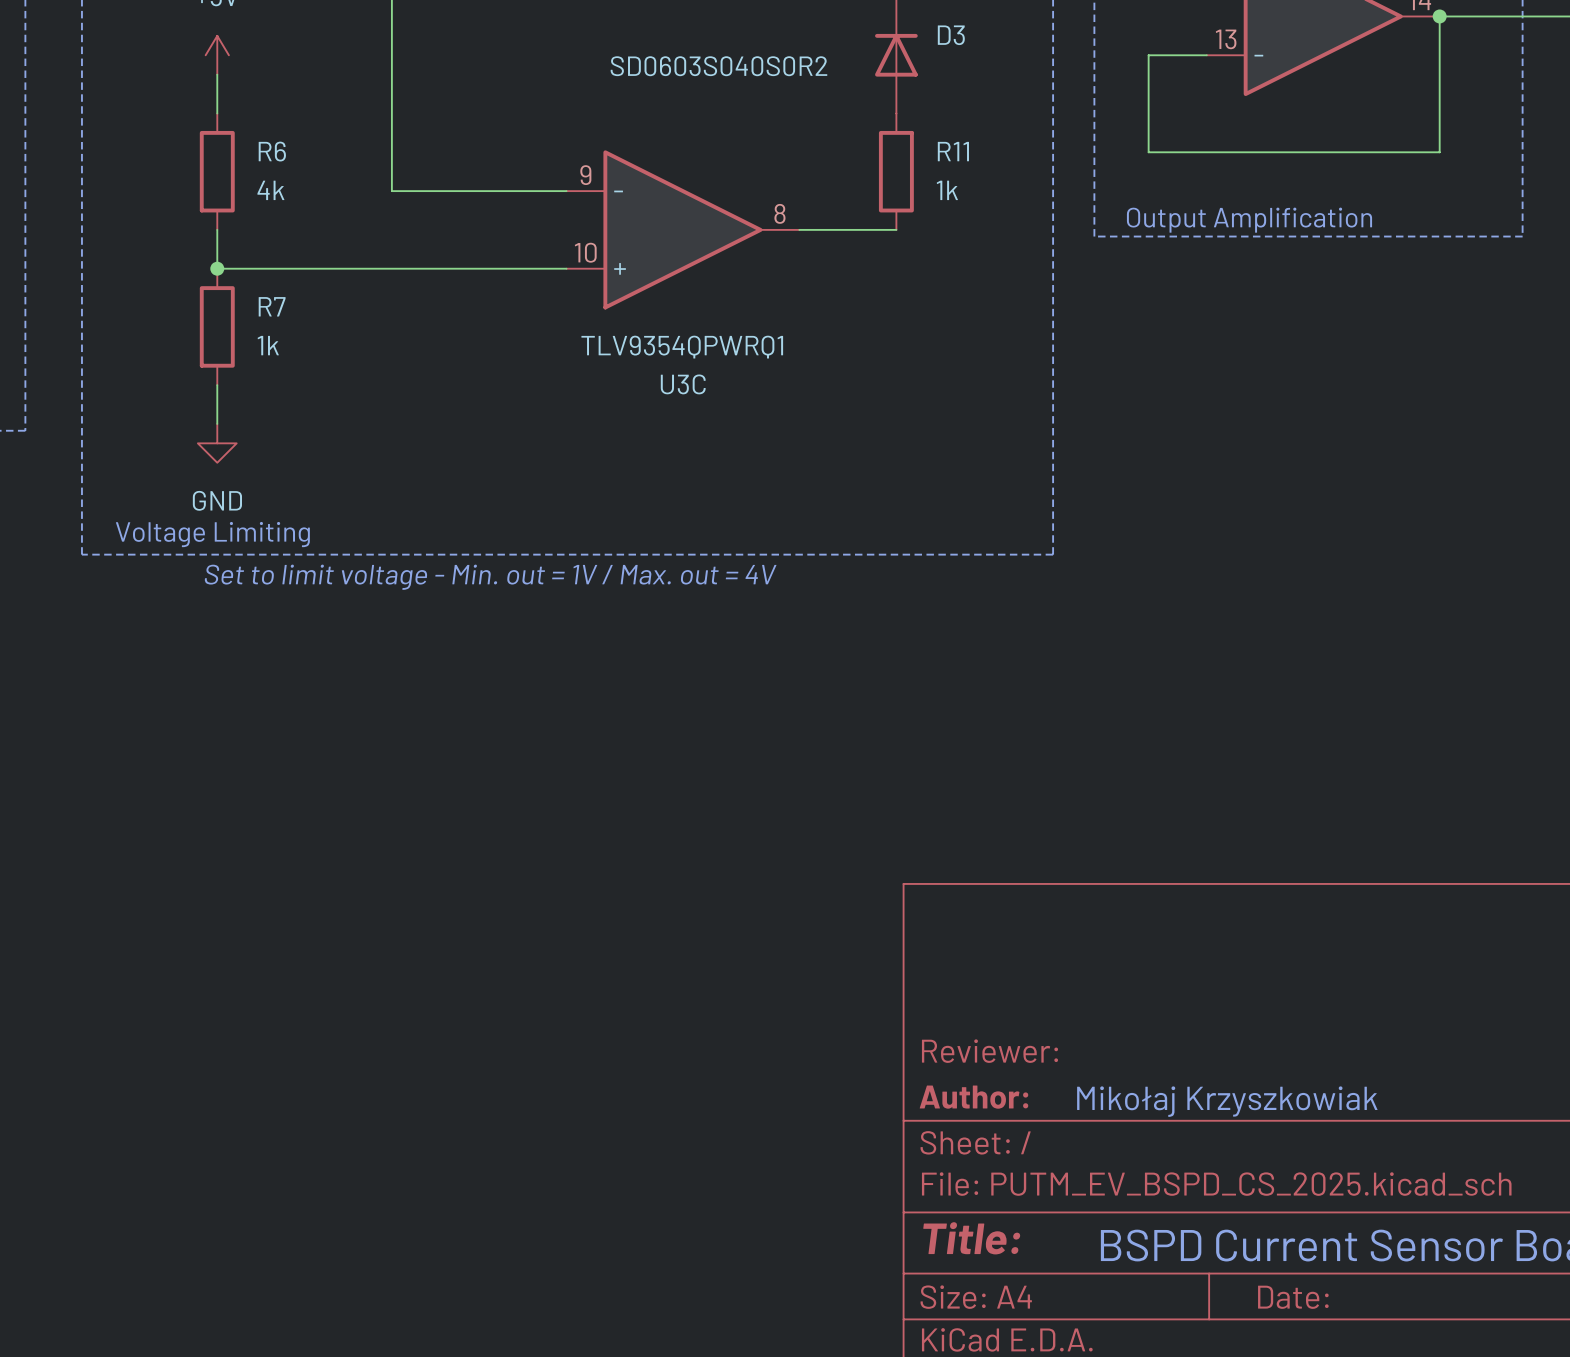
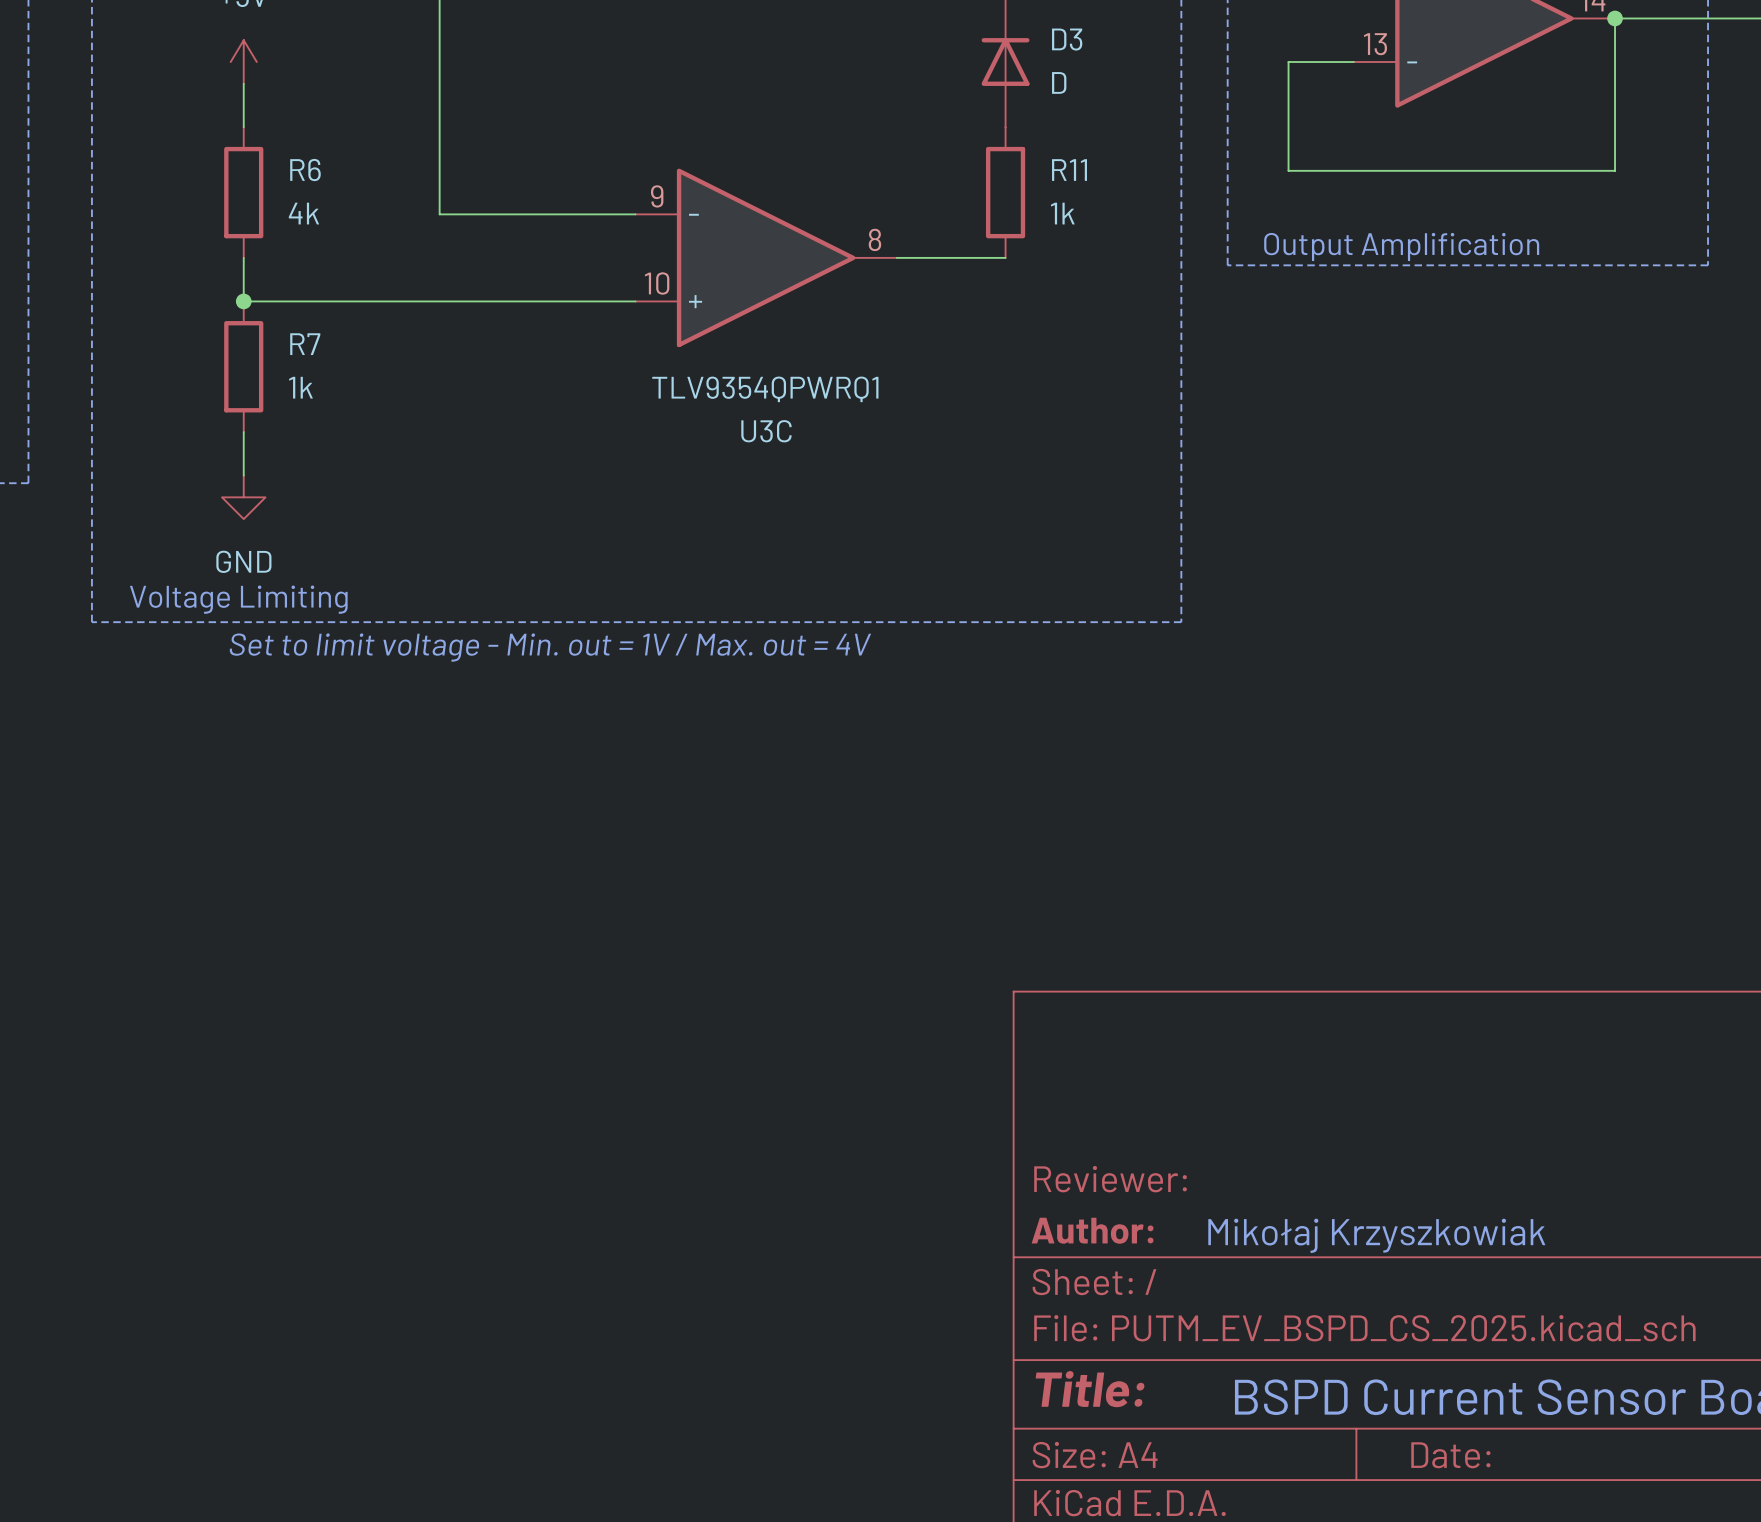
D3 value: SD0603S040S0R2 (718, 66) -> D (1059, 82)

